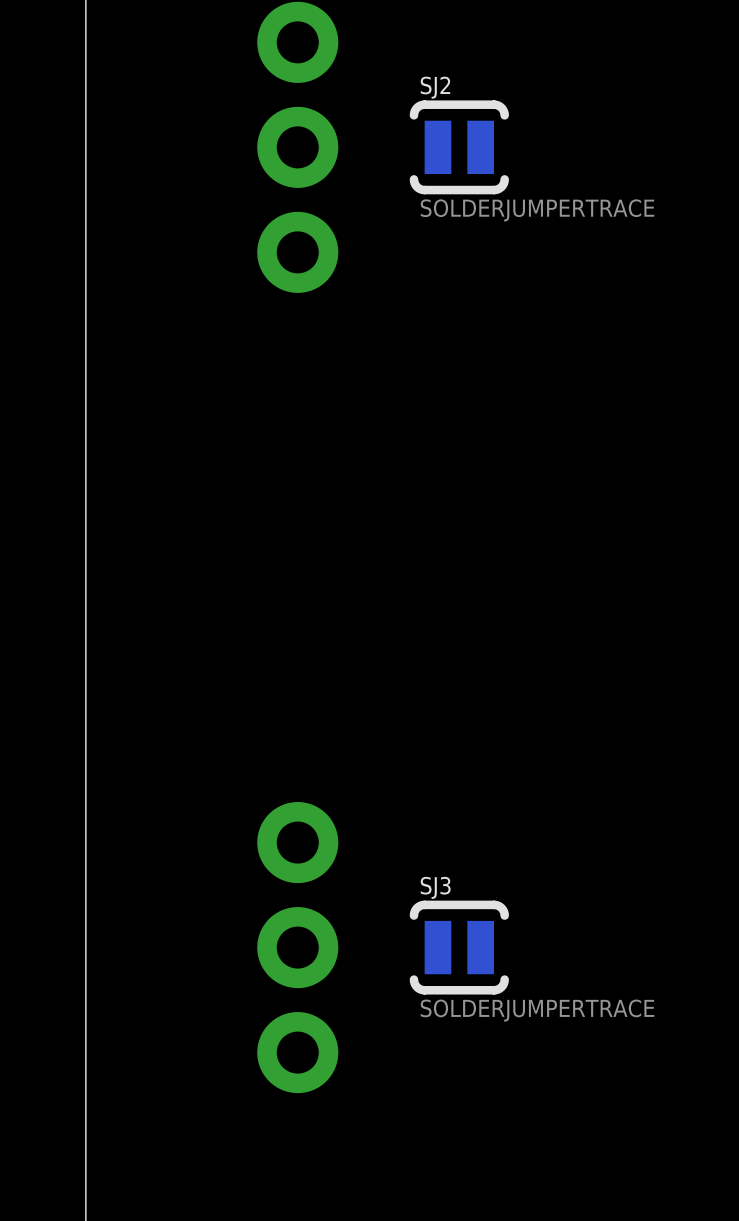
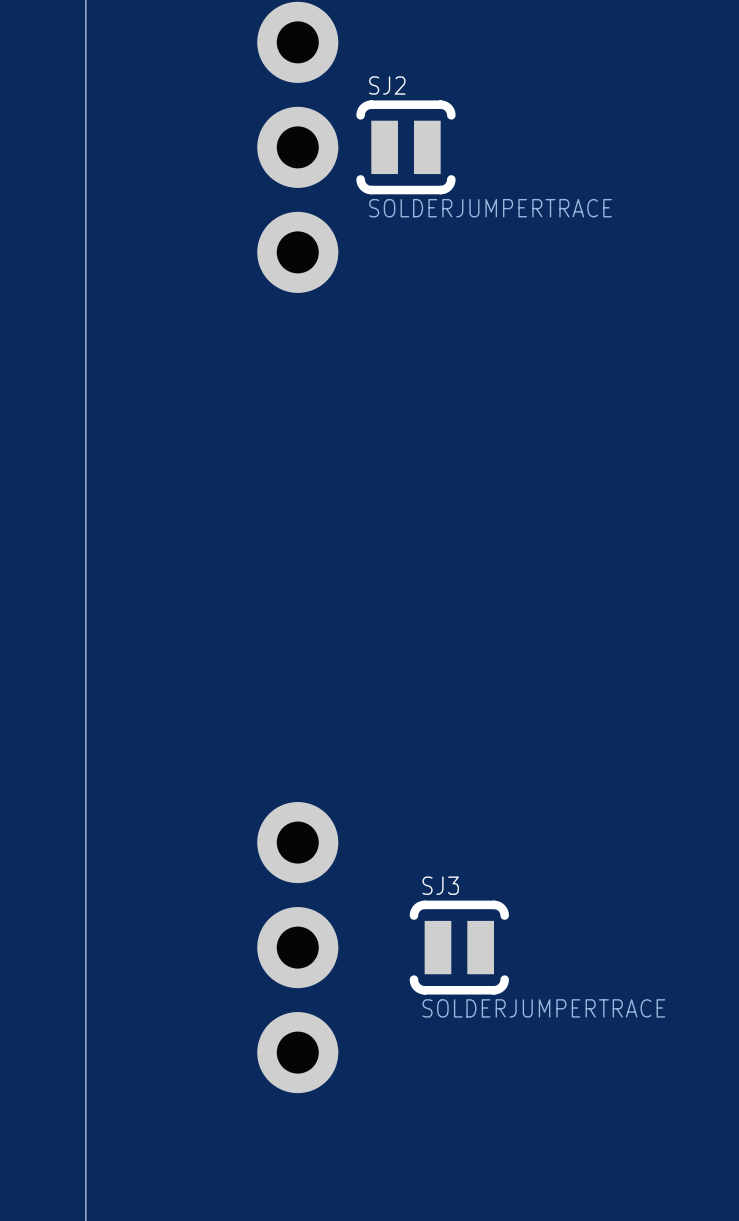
SJ2 position: (459, 147) -> (405, 147)

